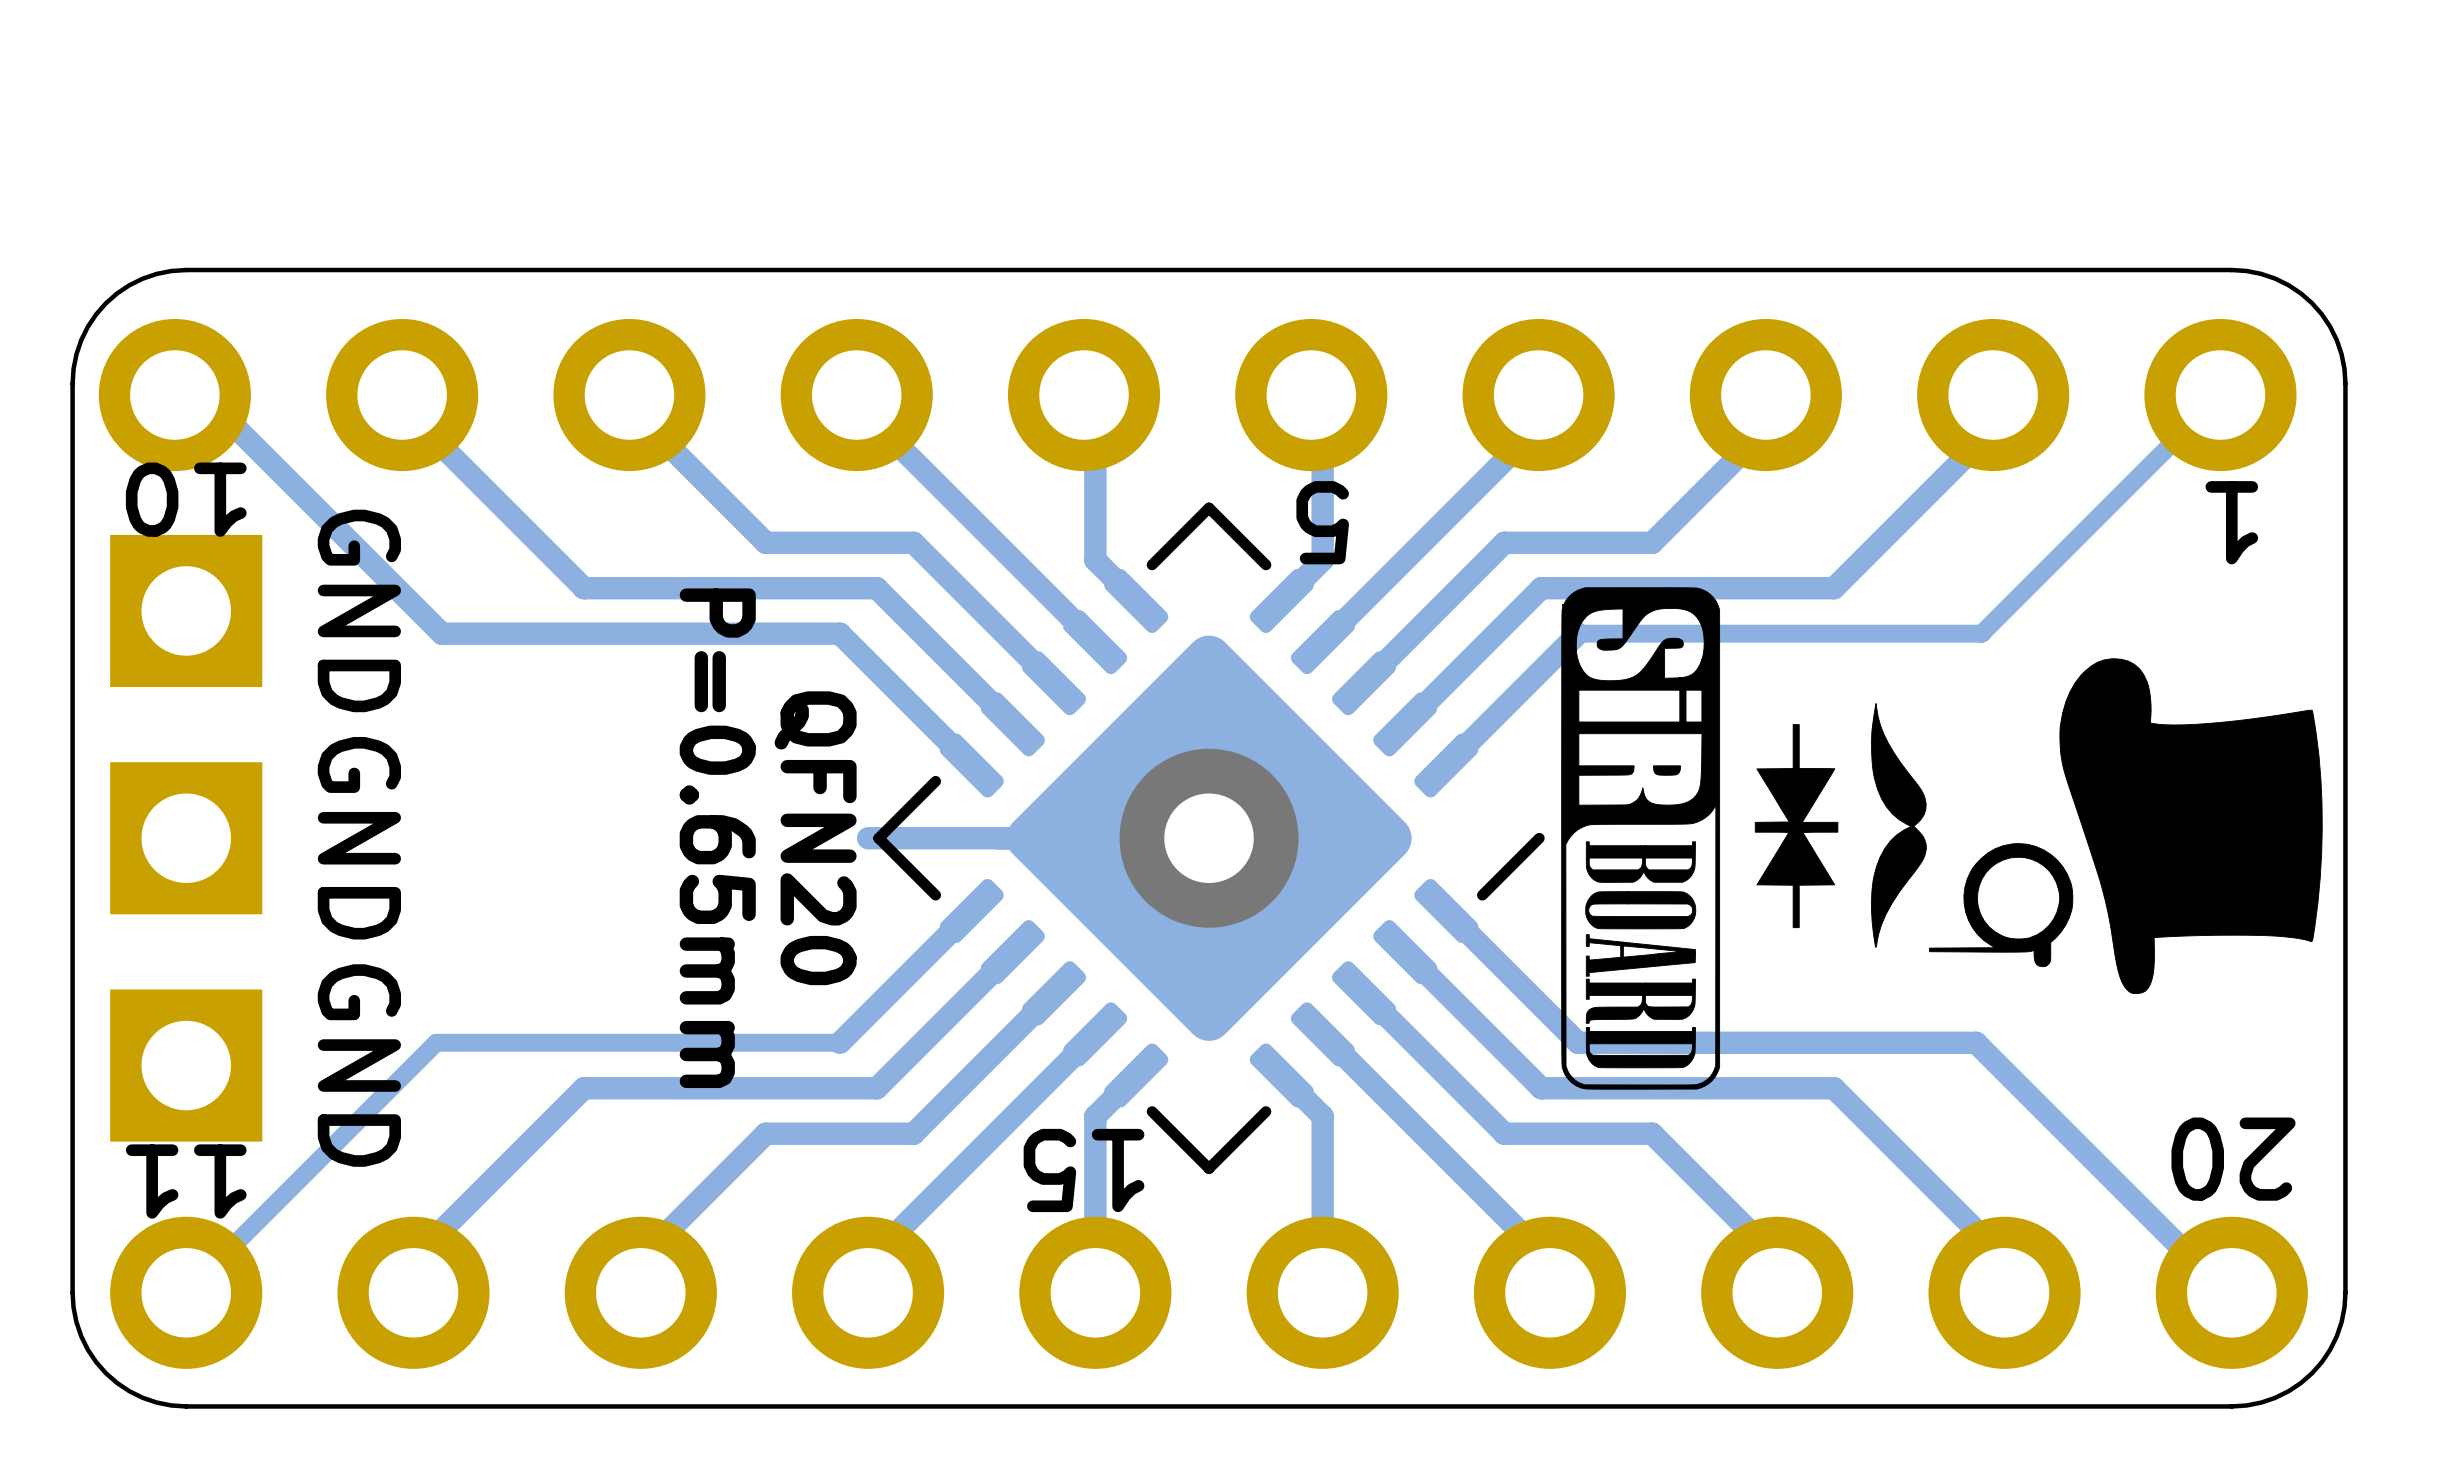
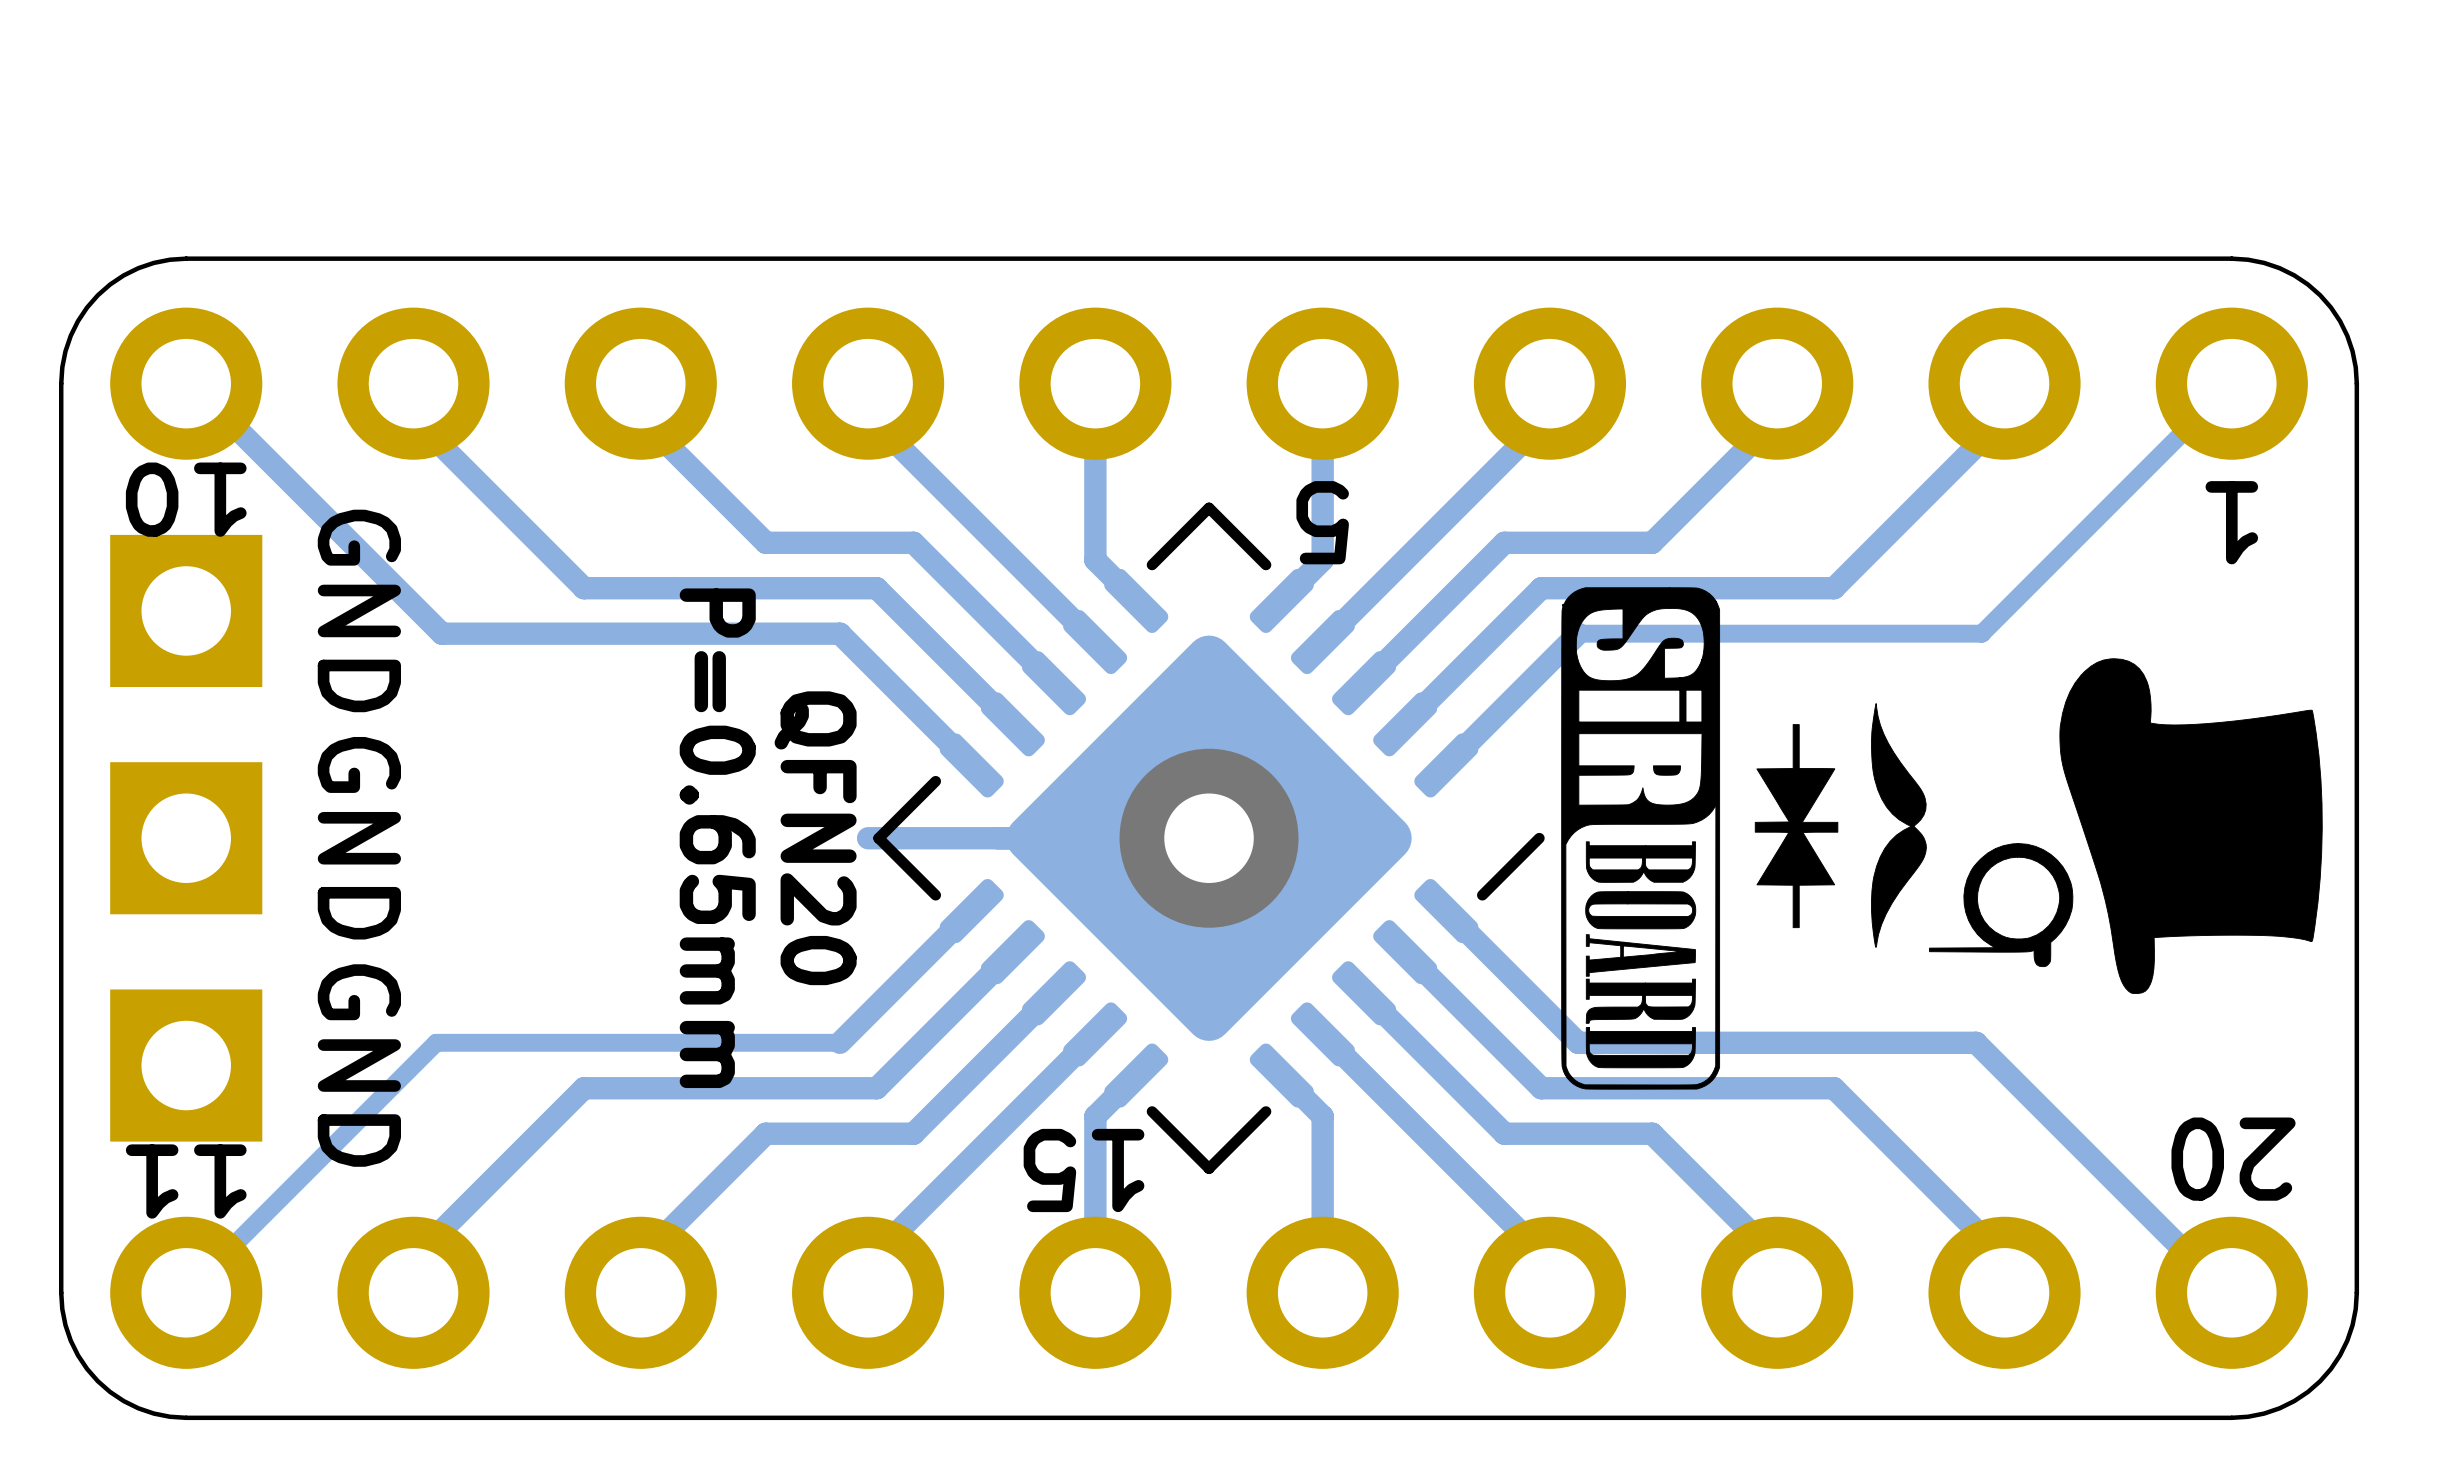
board edge: (2231, 270) (186, 270) (156, 273) (129, 285) (105, 303) (87, 326) (76, 354) (72, 383) (72, 1292) (76, 1322) (87, 1349) (105, 1373) (129, 1391) (156, 1402) (186, 1406) (2231, 1406) (2261, 1402) (2288, 1391) (2312, 1373) (2330, 1349) (2341, 1322) (2345, 1292) (2345, 383) (2341, 354) (2336, 340) (2330, 326) (2312, 303) (2288, 285) (2275, 278) (2261, 273) (2231, 270) -> (2231, 258) (186, 258) (153, 262) (123, 275) (97, 295) (77, 321) (65, 351) (61, 383) (61, 1292) (65, 1325) (77, 1355) (97, 1381) (123, 1401) (153, 1413) (186, 1417) (2231, 1417) (2264, 1413) (2294, 1401) (2320, 1381) (2340, 1355) (2352, 1325) (2356, 1292) (2356, 383) (2352, 351) (2347, 335) (2330, 307) (2320, 295) (2307, 284) (2279, 268) (2264, 262) (2231, 258)
part position: (1197, 395) -> (1209, 383)

